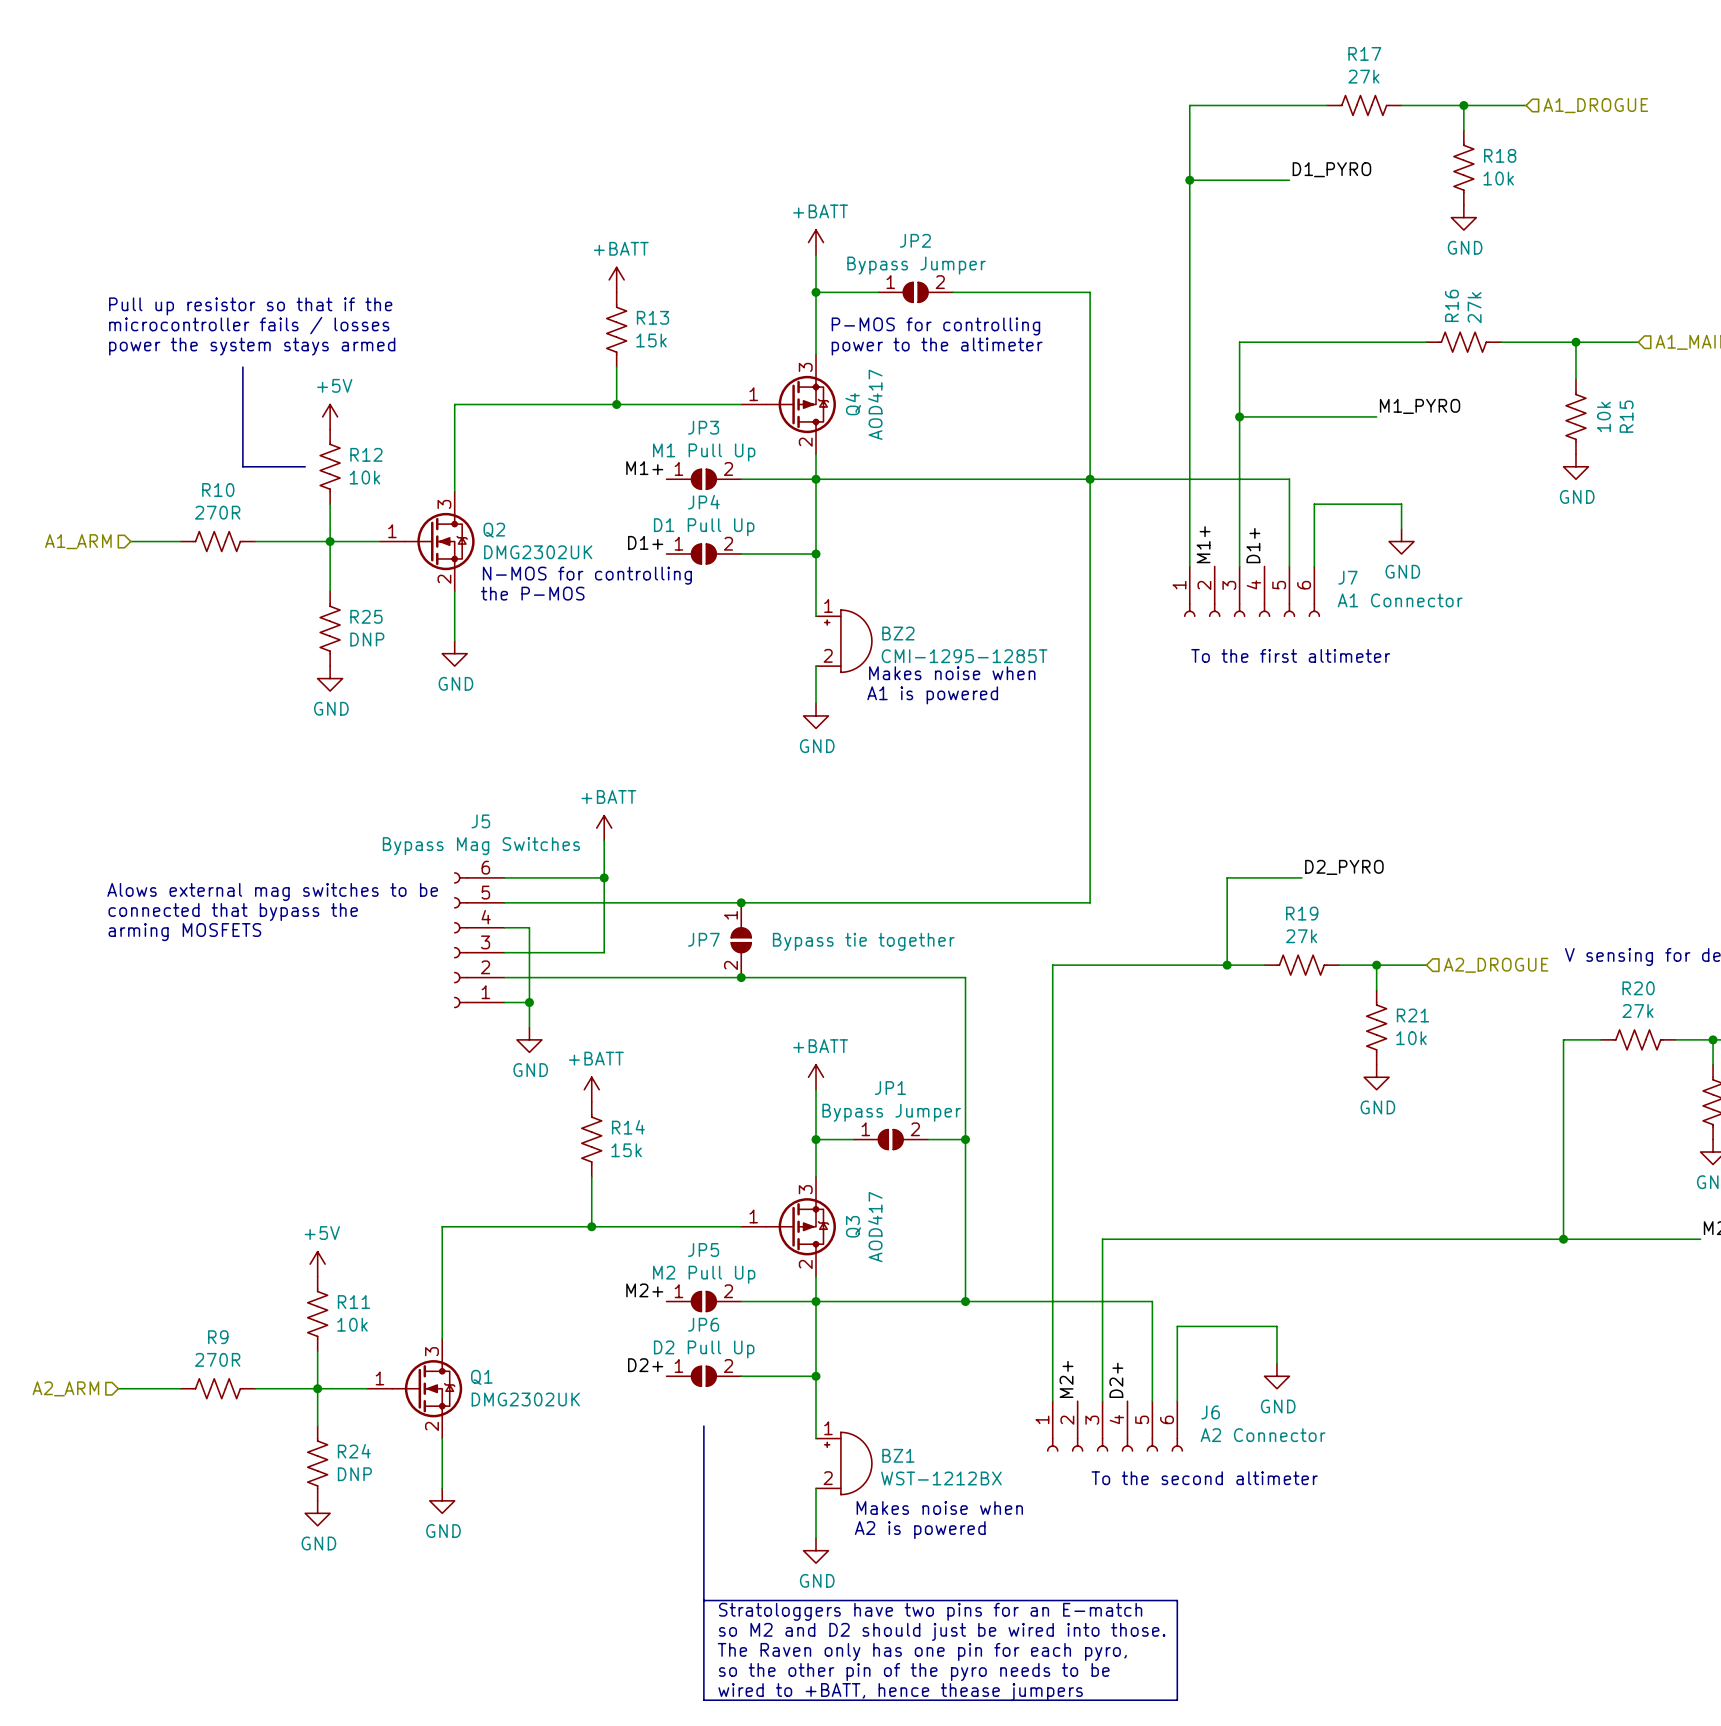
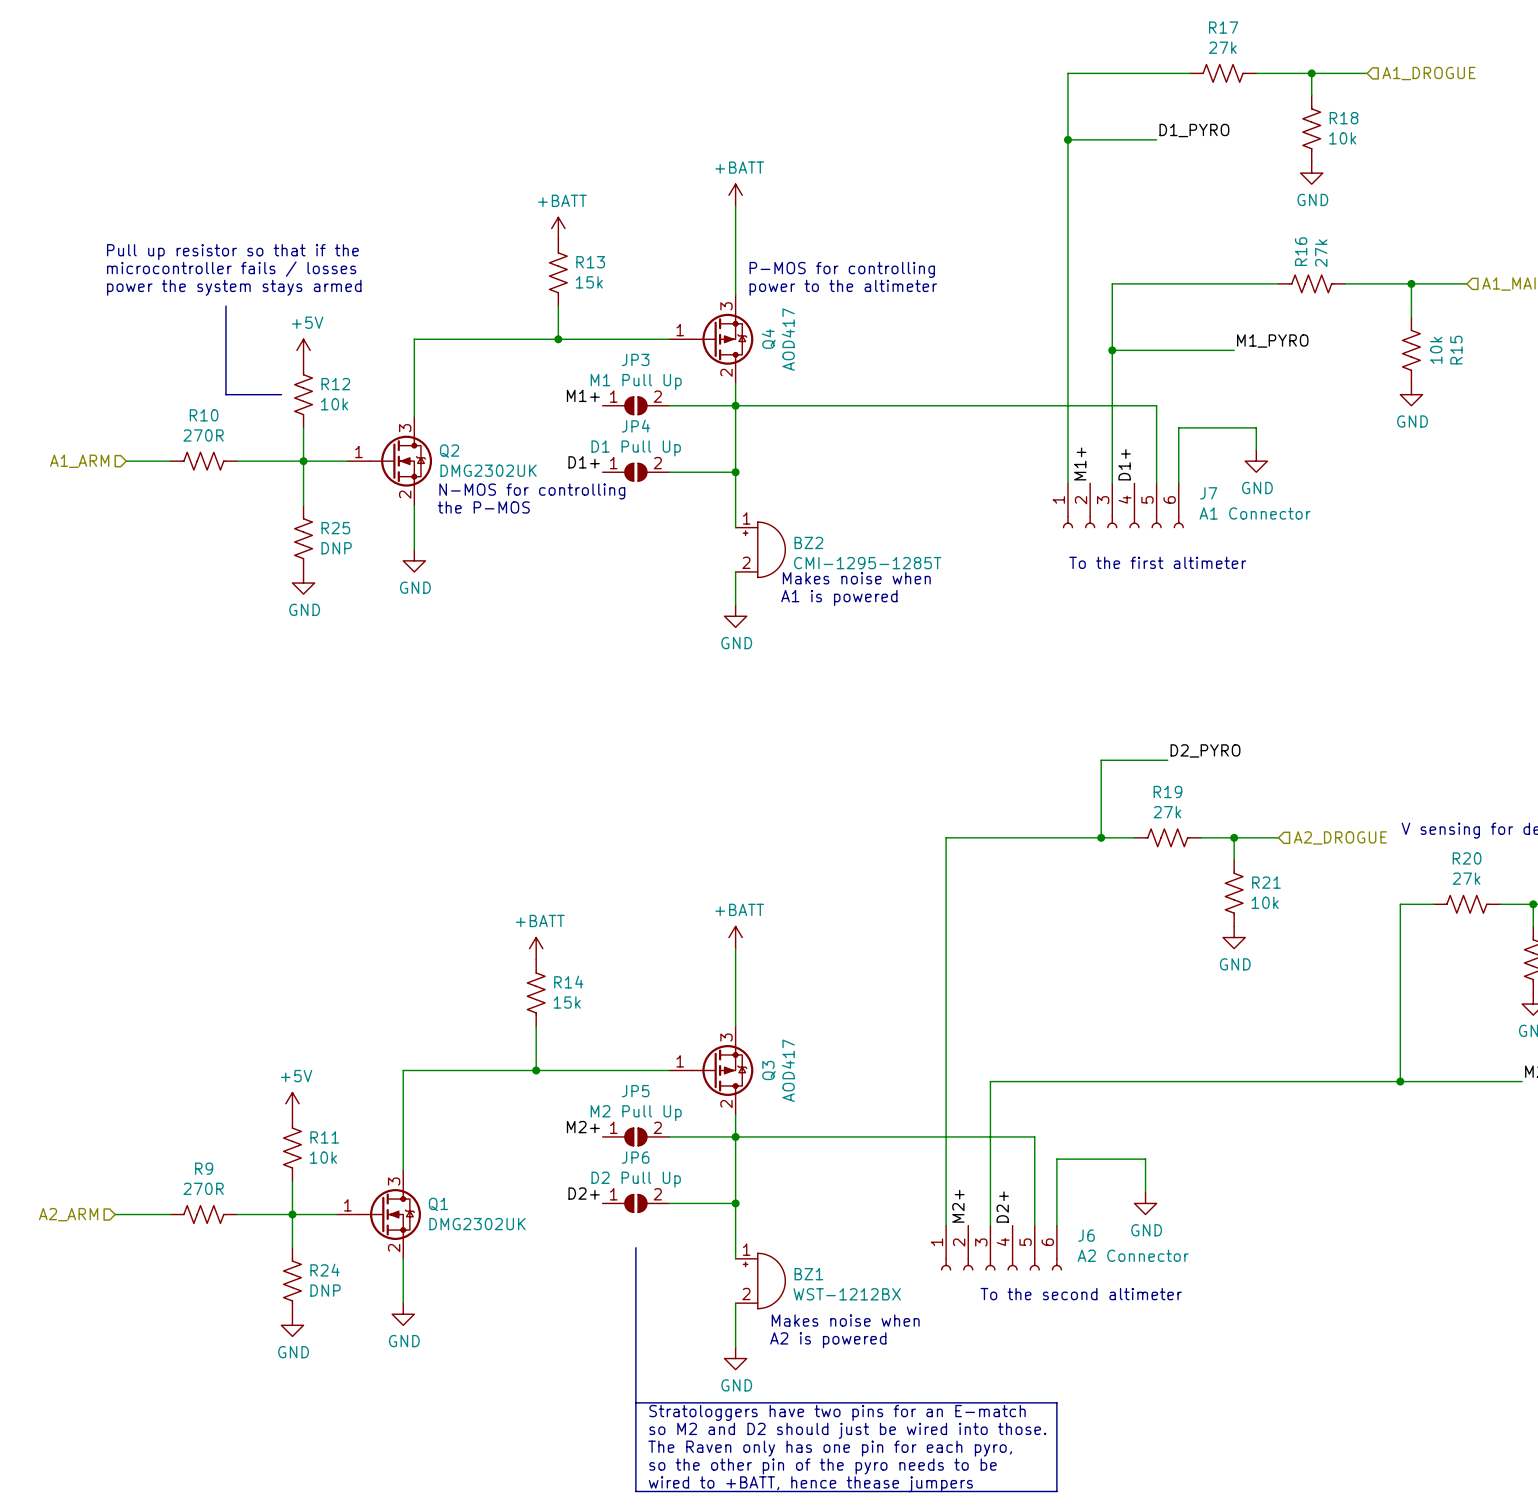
wire: (816, 292) (878, 292) -> none
junction: (816, 292) -> none
JP2: Bypass Jumper (915, 292) -> none
wire: (953, 292) (1090, 292) (1090, 902) (504, 902) -> none
junction: (1090, 479) -> none
power symbol: +BATT (604, 828) -> none
wire: (604, 840) (604, 952) (504, 952) -> none
wire: (504, 877) (604, 877) -> none
junction: (604, 877) -> none
text: Alows external mag switches to be (272, 891) -> none
junction: (741, 902) -> none
text: connected that bypass the (233, 912) -> none
wire: (504, 927) (529, 927) (529, 1027) -> none
text: arming MOSFETS (184, 932) -> none
J5: Bypass Mag Switches (479, 940) -> none
JP7: Bypass tie together (741, 940) -> none
wire: (504, 977) (965, 977) (965, 1301) -> none
junction: (741, 977) -> none
wire: (504, 1002) (529, 1002) -> none
junction: (529, 1002) -> none
power symbol: GND (529, 1039) -> none
wire: (816, 1139) (853, 1139) -> none
junction: (816, 1139) -> none
JP1: Bypass Jumper (890, 1139) -> none
wire: (928, 1139) (965, 1139) -> none
junction: (965, 1139) -> none
junction: (965, 1301) -> none

